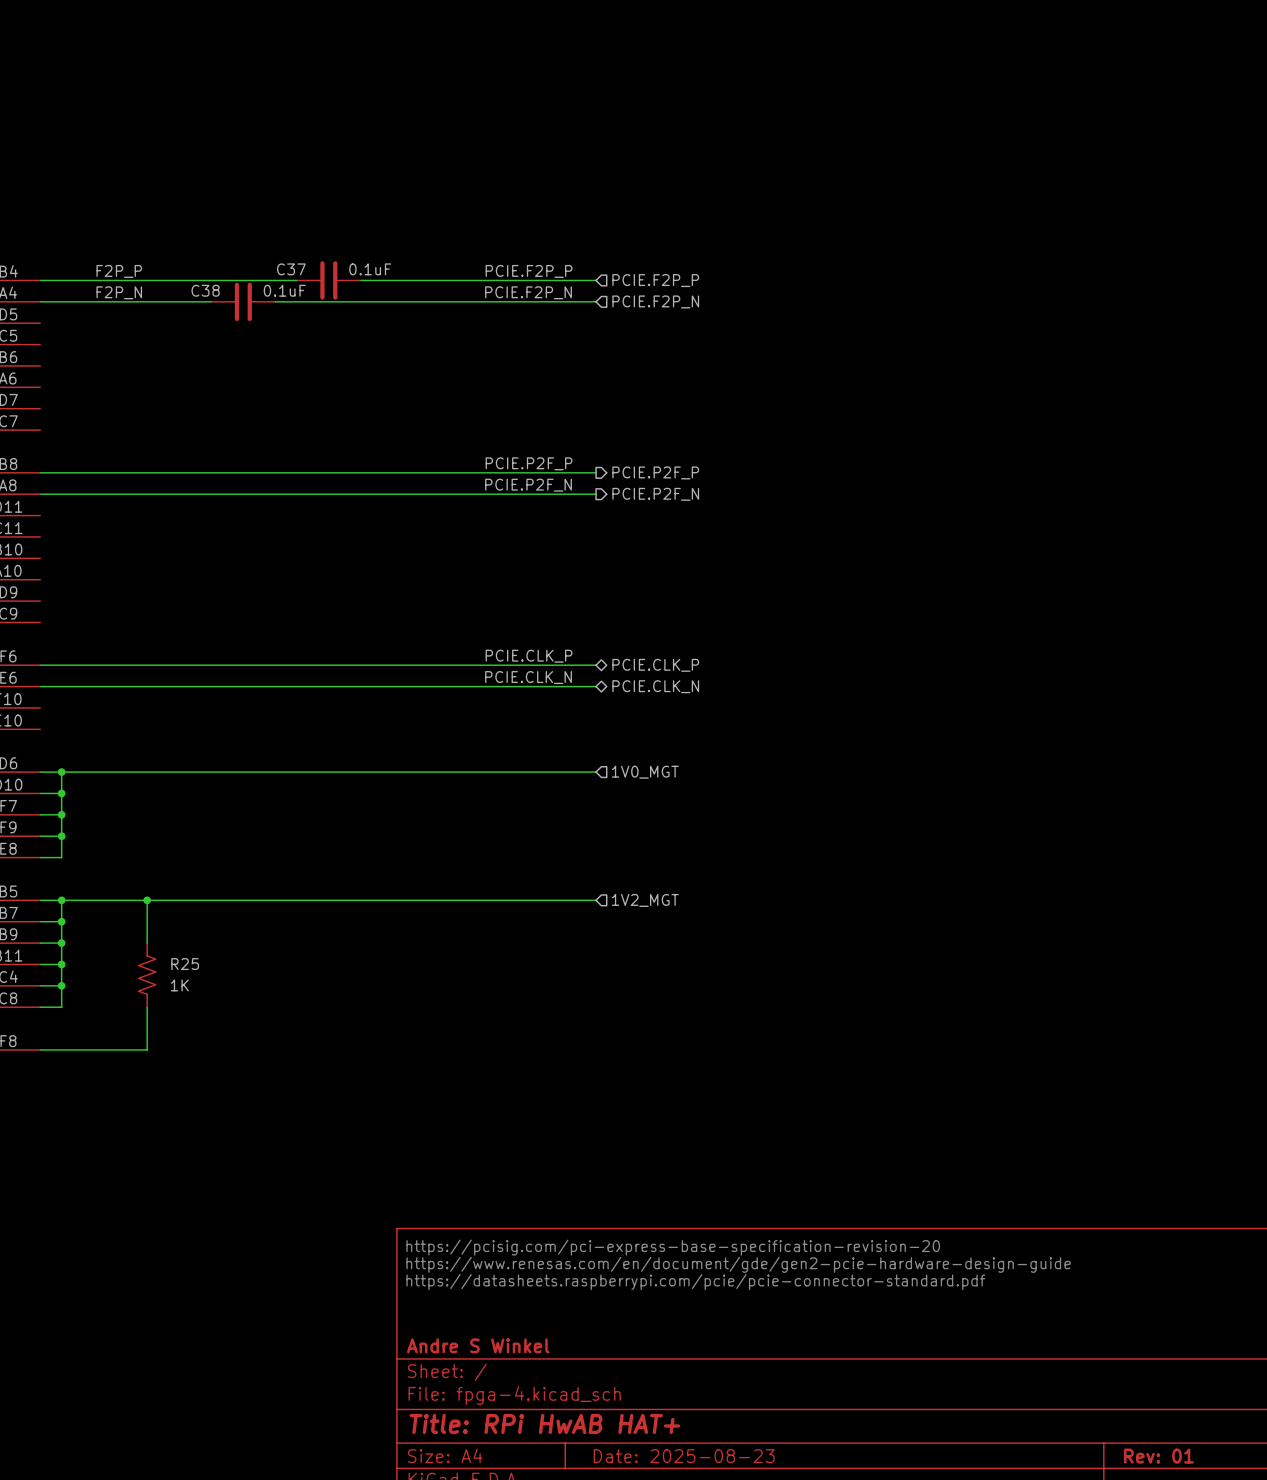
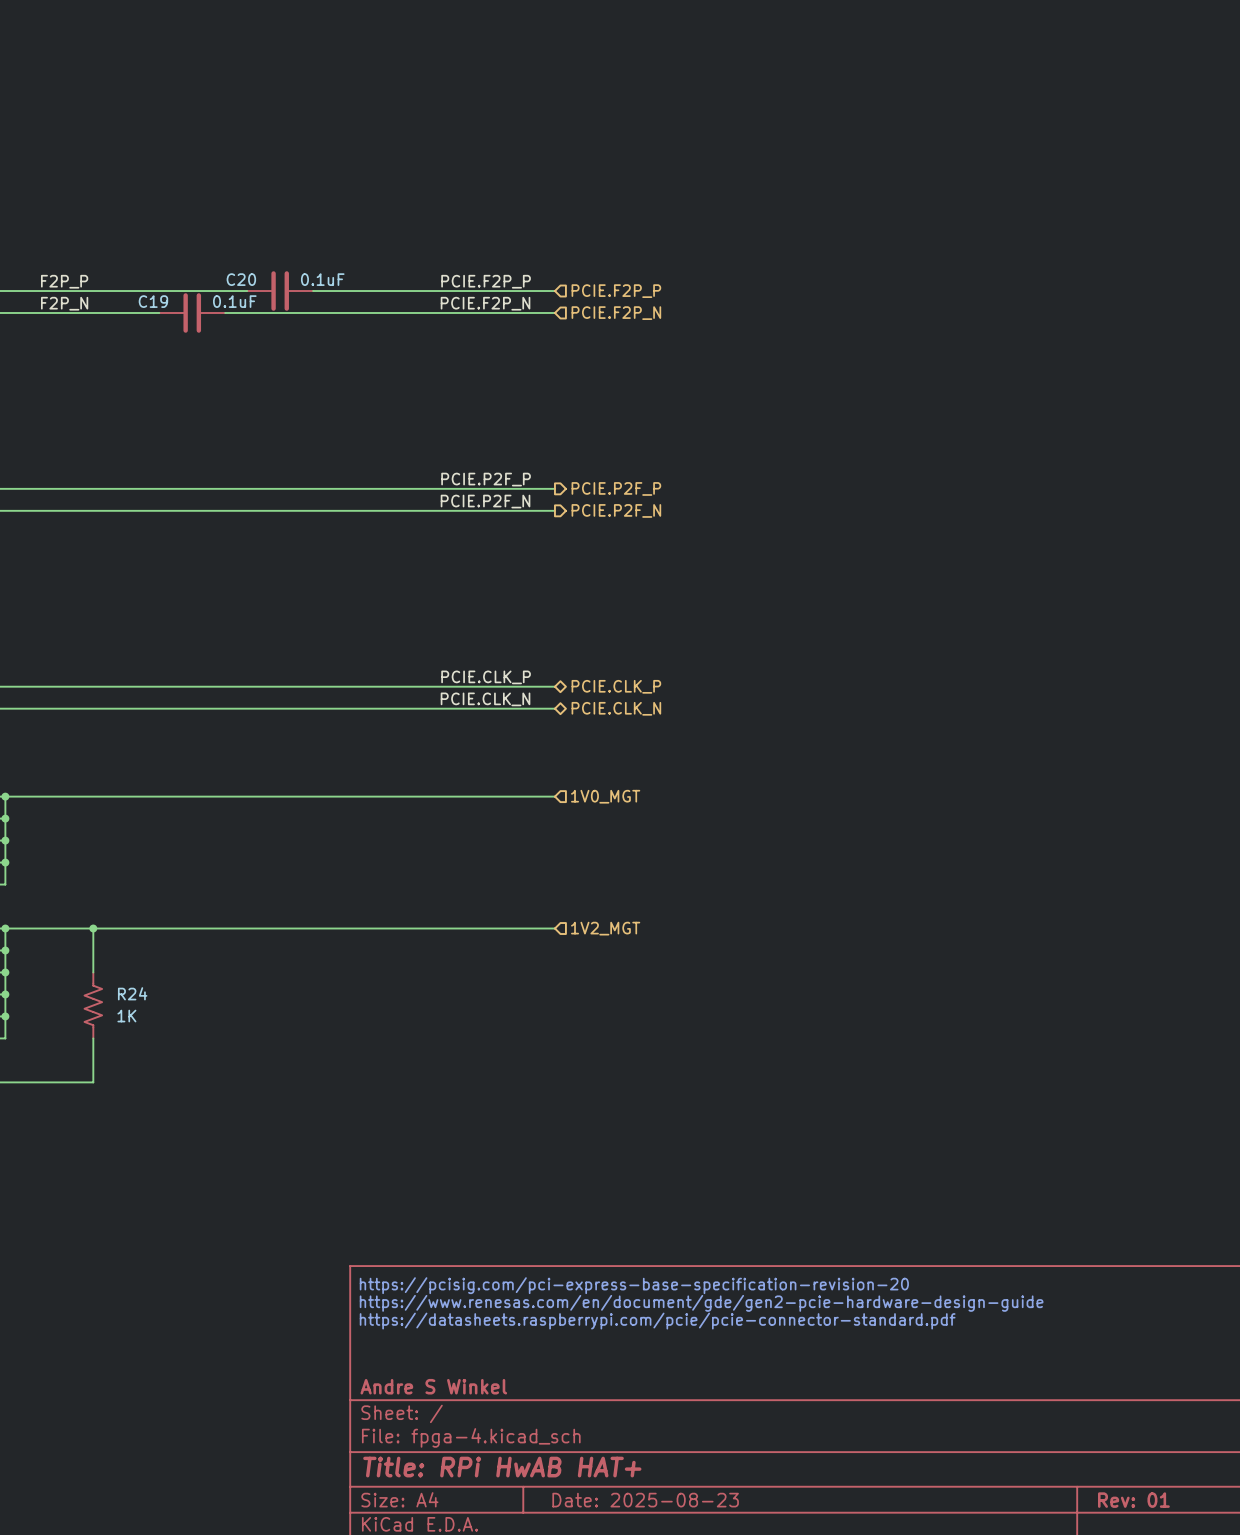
C37 name: C37 (291, 269) -> C20 (241, 279)
C38 name: C38 (205, 290) -> C19 (153, 301)
R25 name: R25 (185, 964) -> R24 (132, 993)

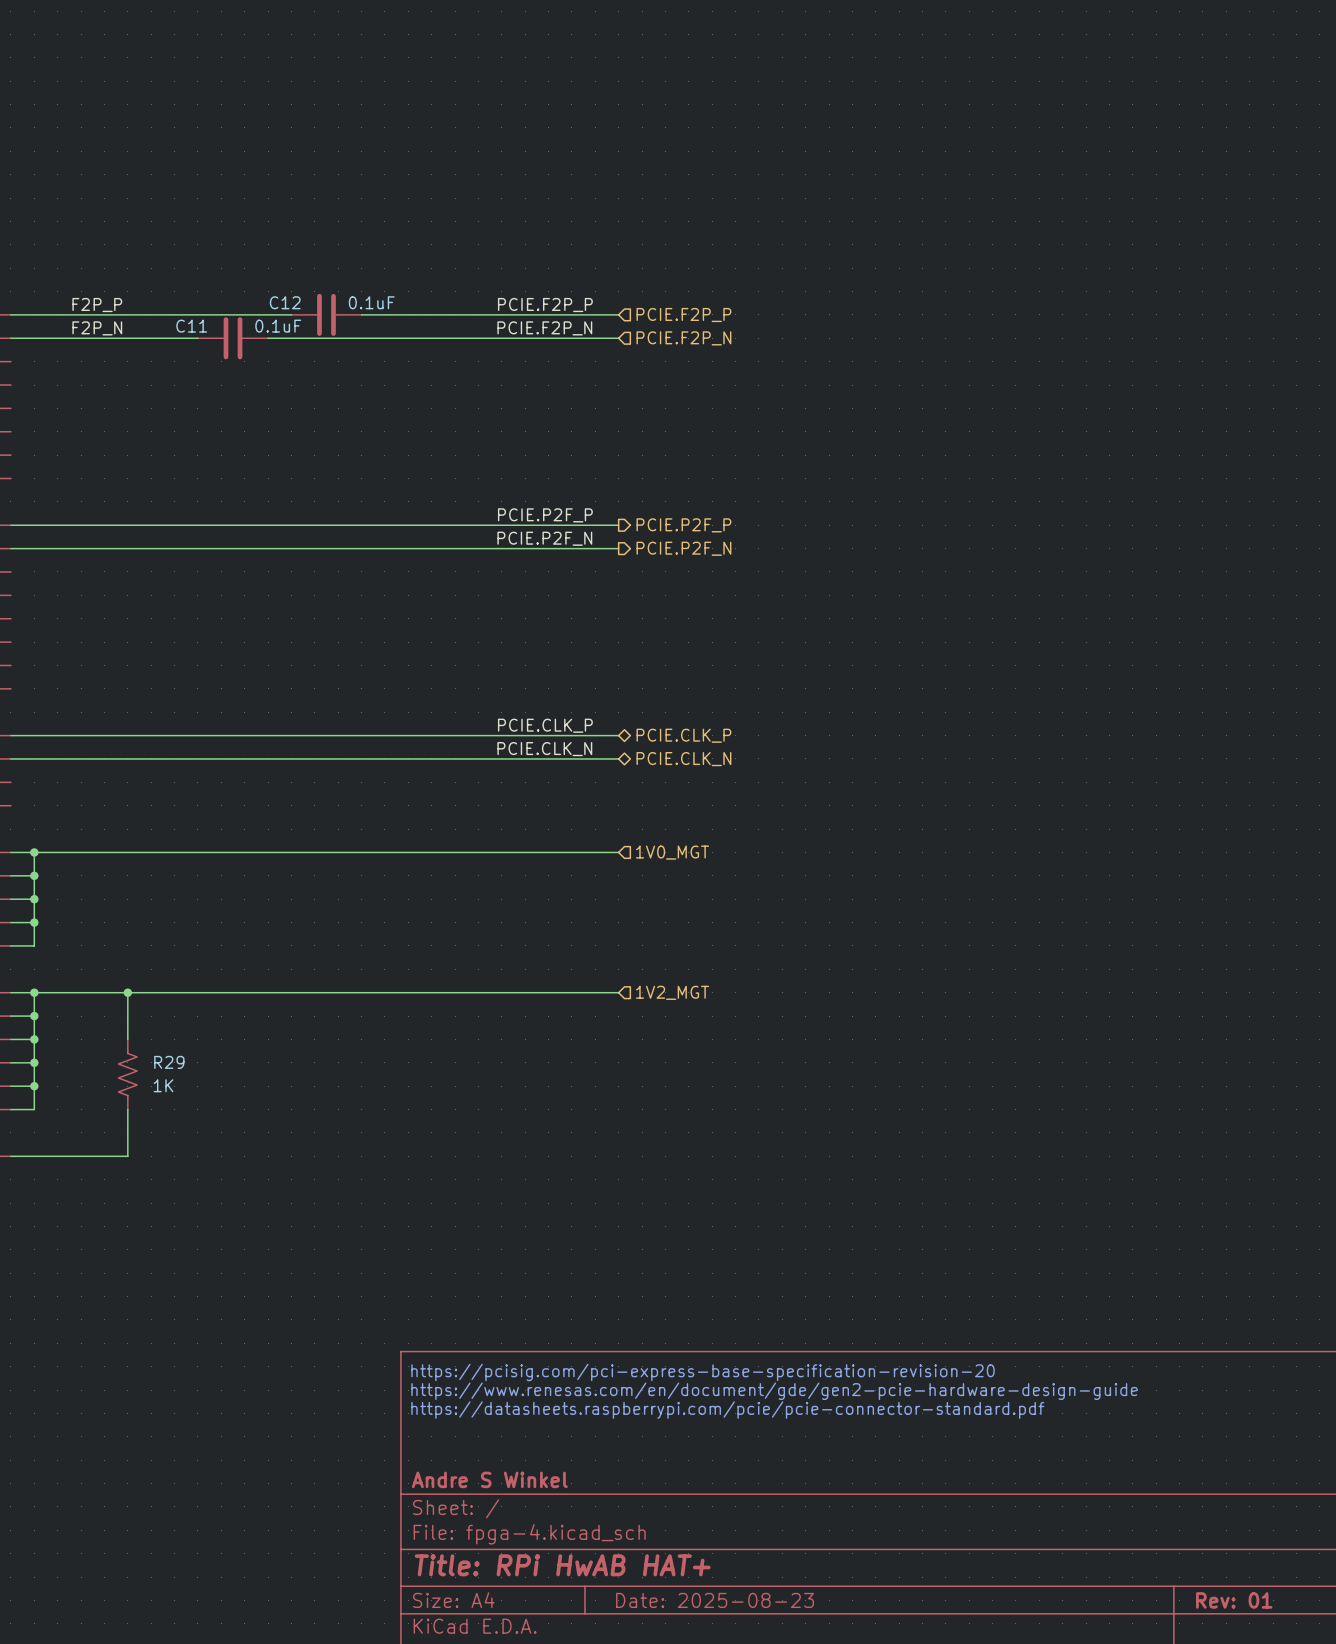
C20 name: C20 (241, 279) -> C12 (285, 302)
C19 name: C19 (153, 301) -> C11 (191, 326)
R24 name: R24 (132, 993) -> R29 (169, 1062)

